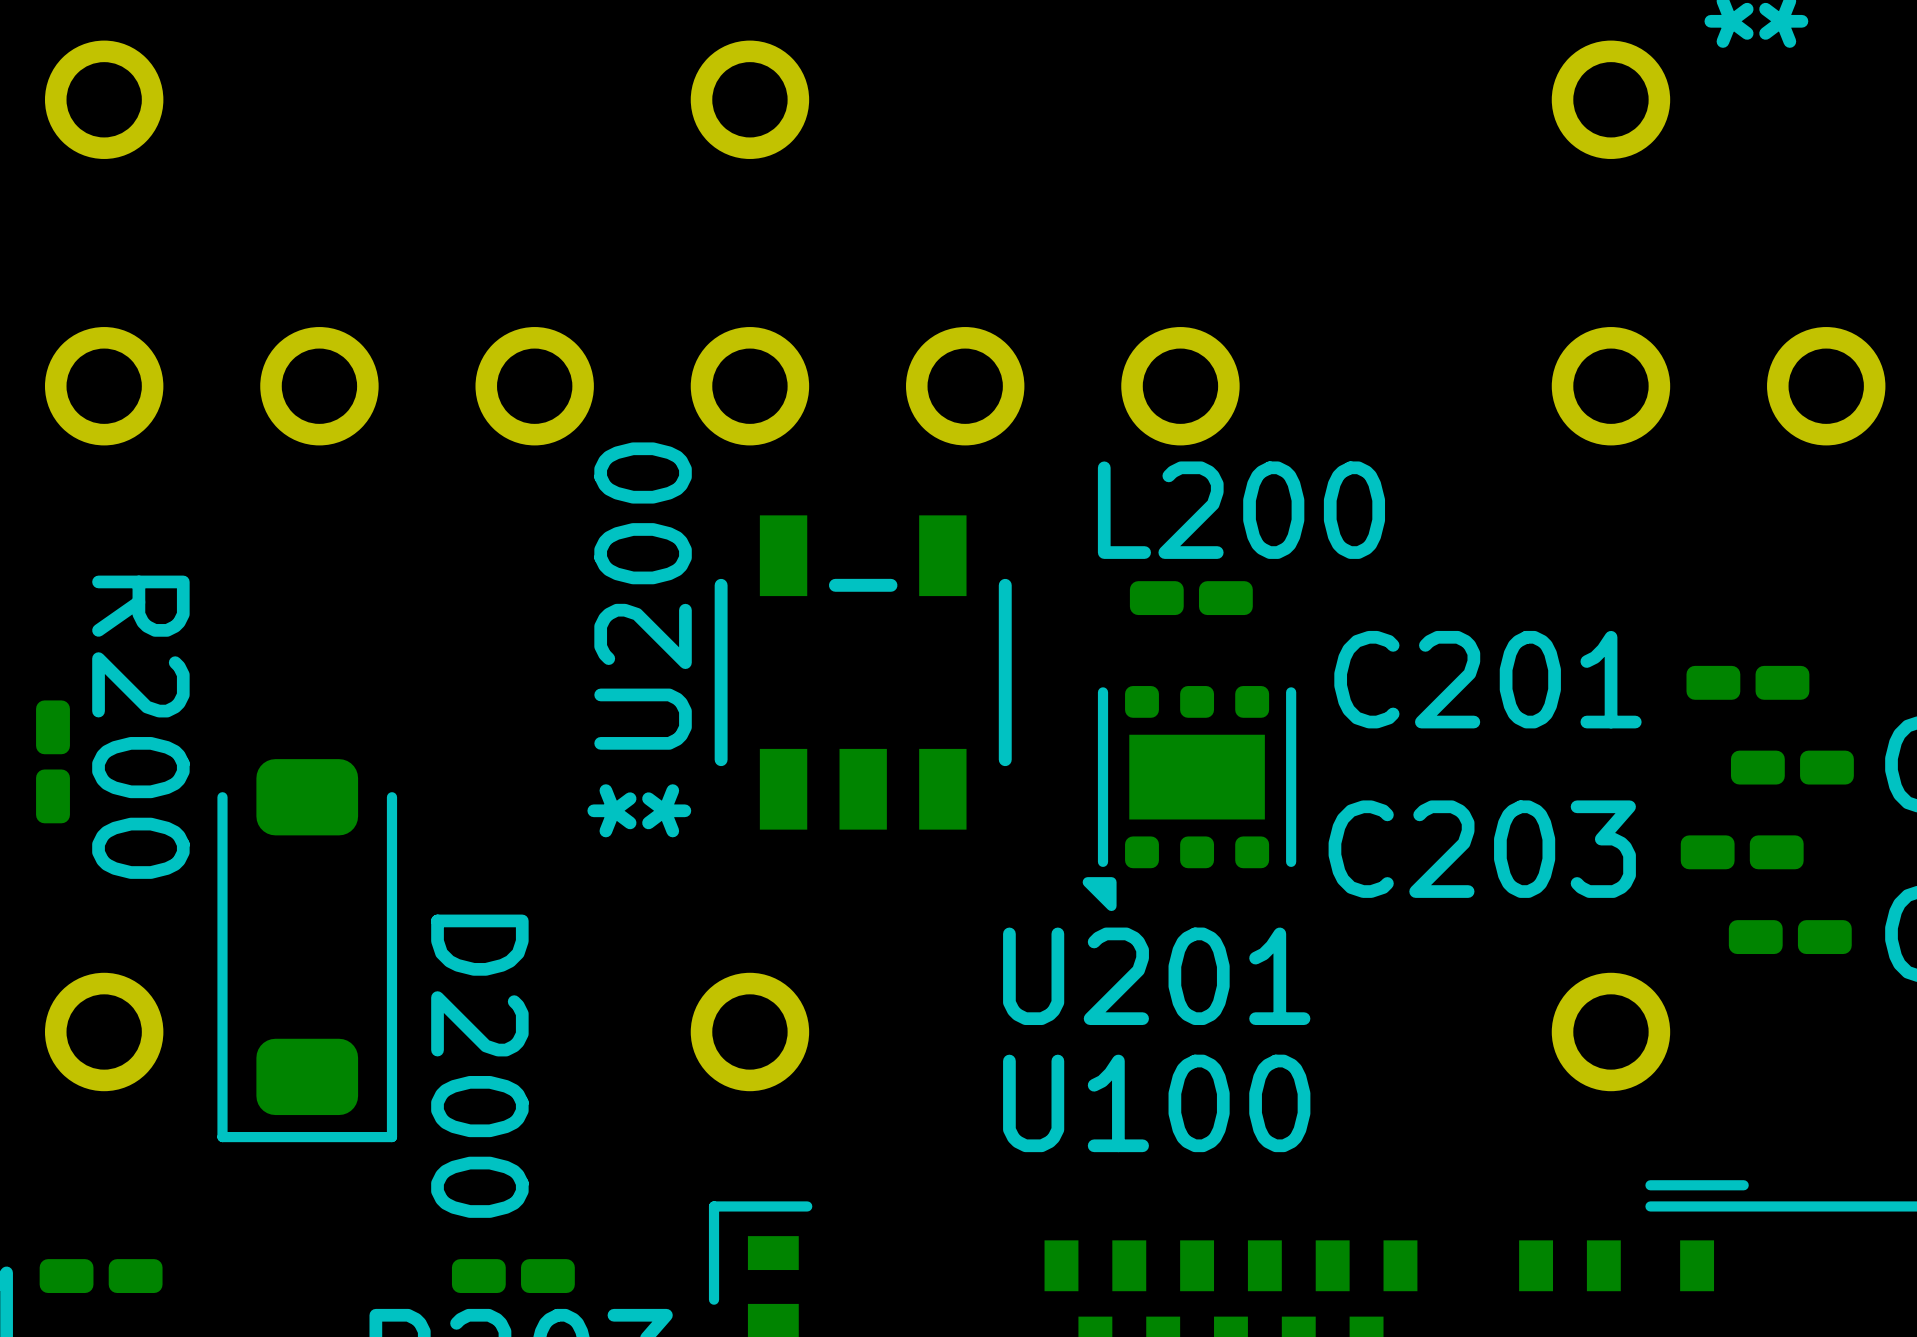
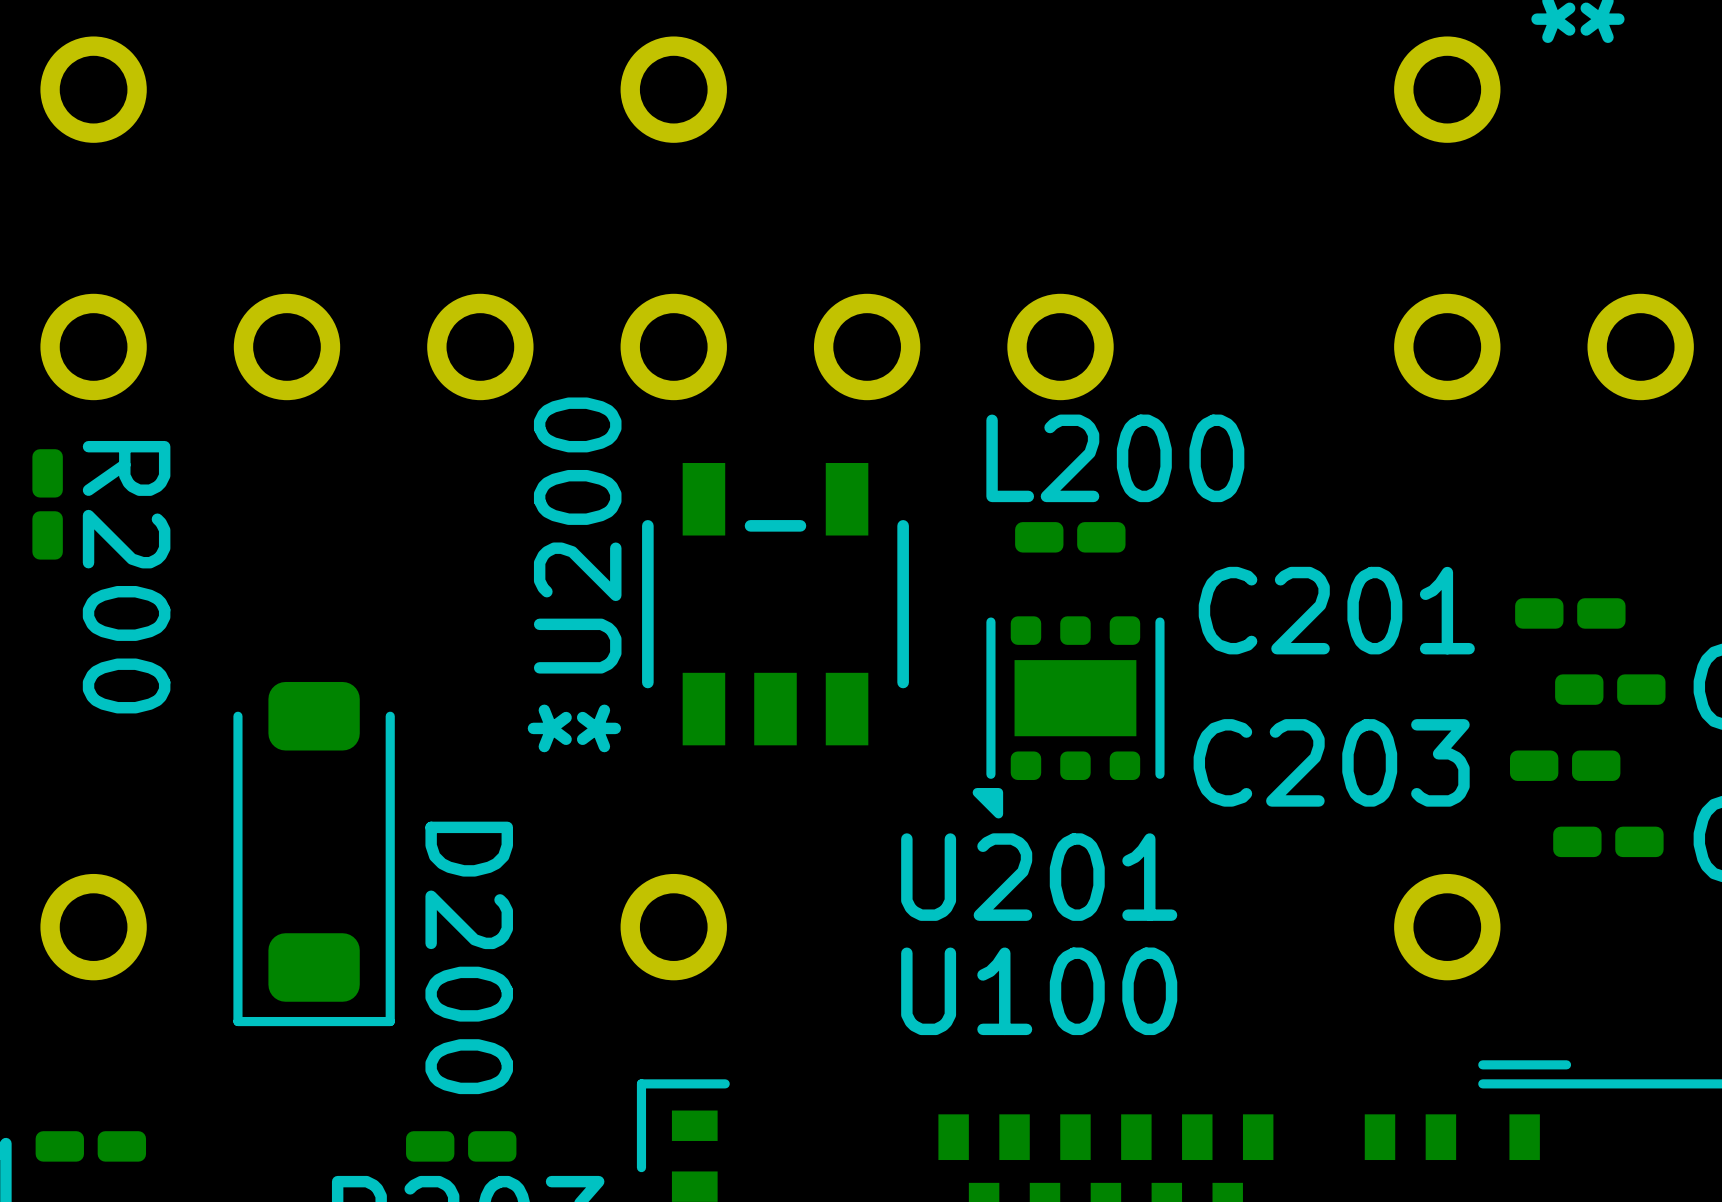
R200 name position: R200 (140, 727) -> R200 (126, 577)
R200 position: (53, 761) -> (47, 504)
D200 position: (307, 950) -> (314, 854)

